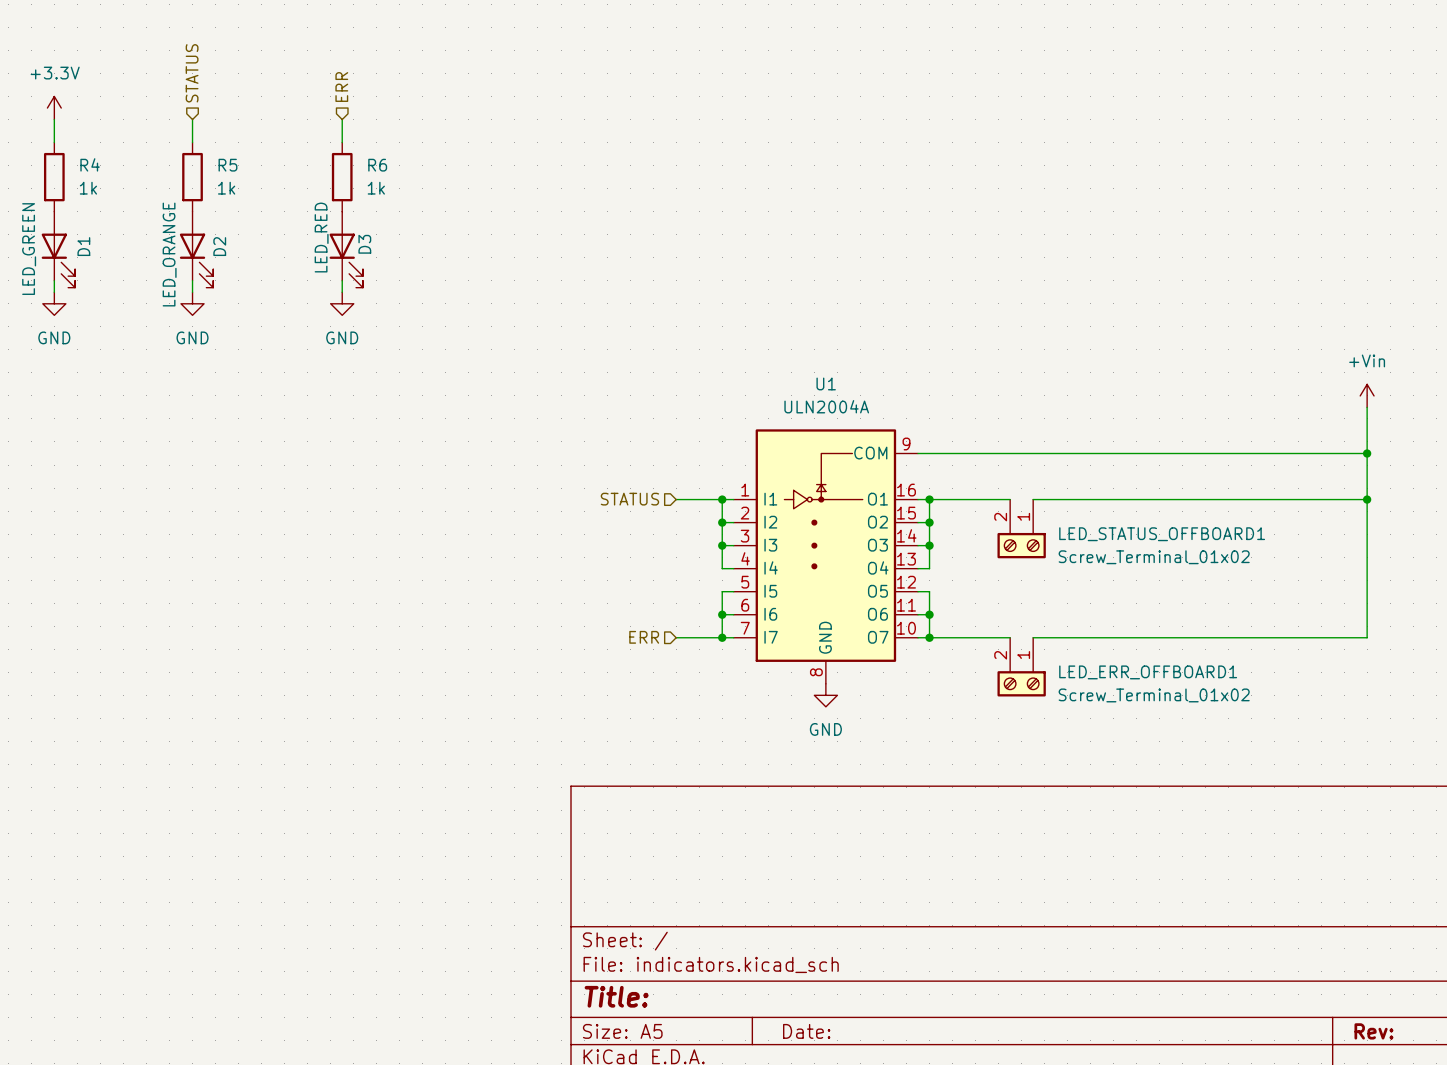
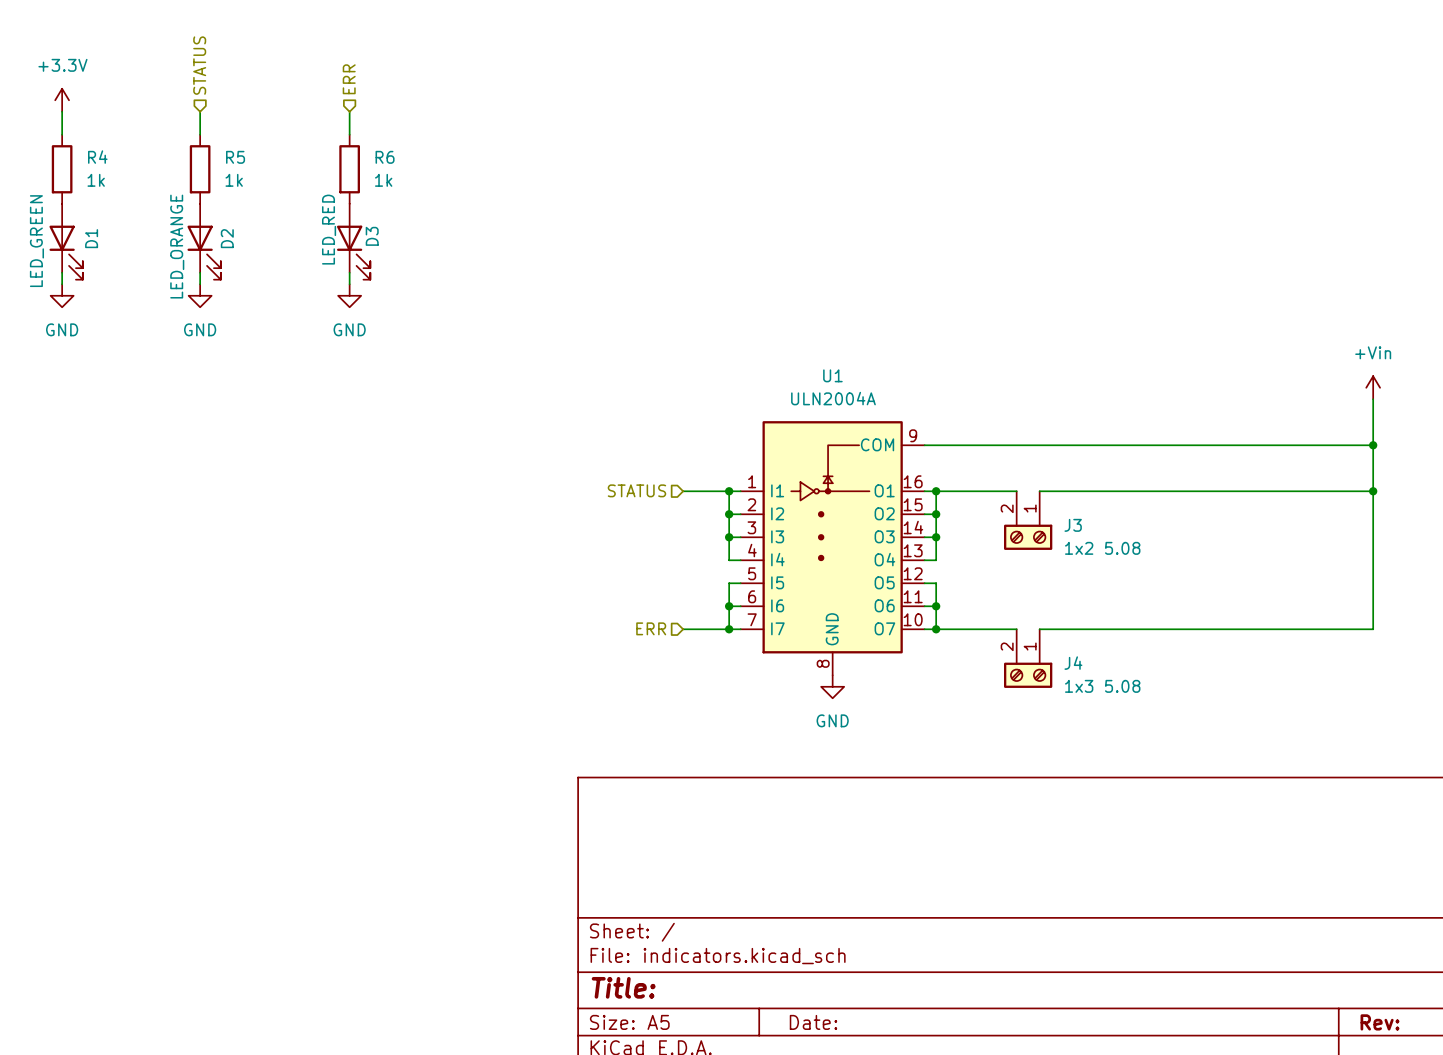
LED_STATUS_OFFBOARD1 name: LED_STATUS_OFFBOARD1 (1162, 534) -> J3 (1073, 525)
LED_STATUS_OFFBOARD1 value: Screw_Terminal_01x02 (1154, 557) -> 1x2 5.08 (1102, 548)
LED_ERR_OFFBOARD1 name: LED_ERR_OFFBOARD1 (1148, 672) -> J4 (1073, 663)
LED_ERR_OFFBOARD1 value: Screw_Terminal_01x02 (1154, 695) -> 1x3 5.08 (1102, 686)

